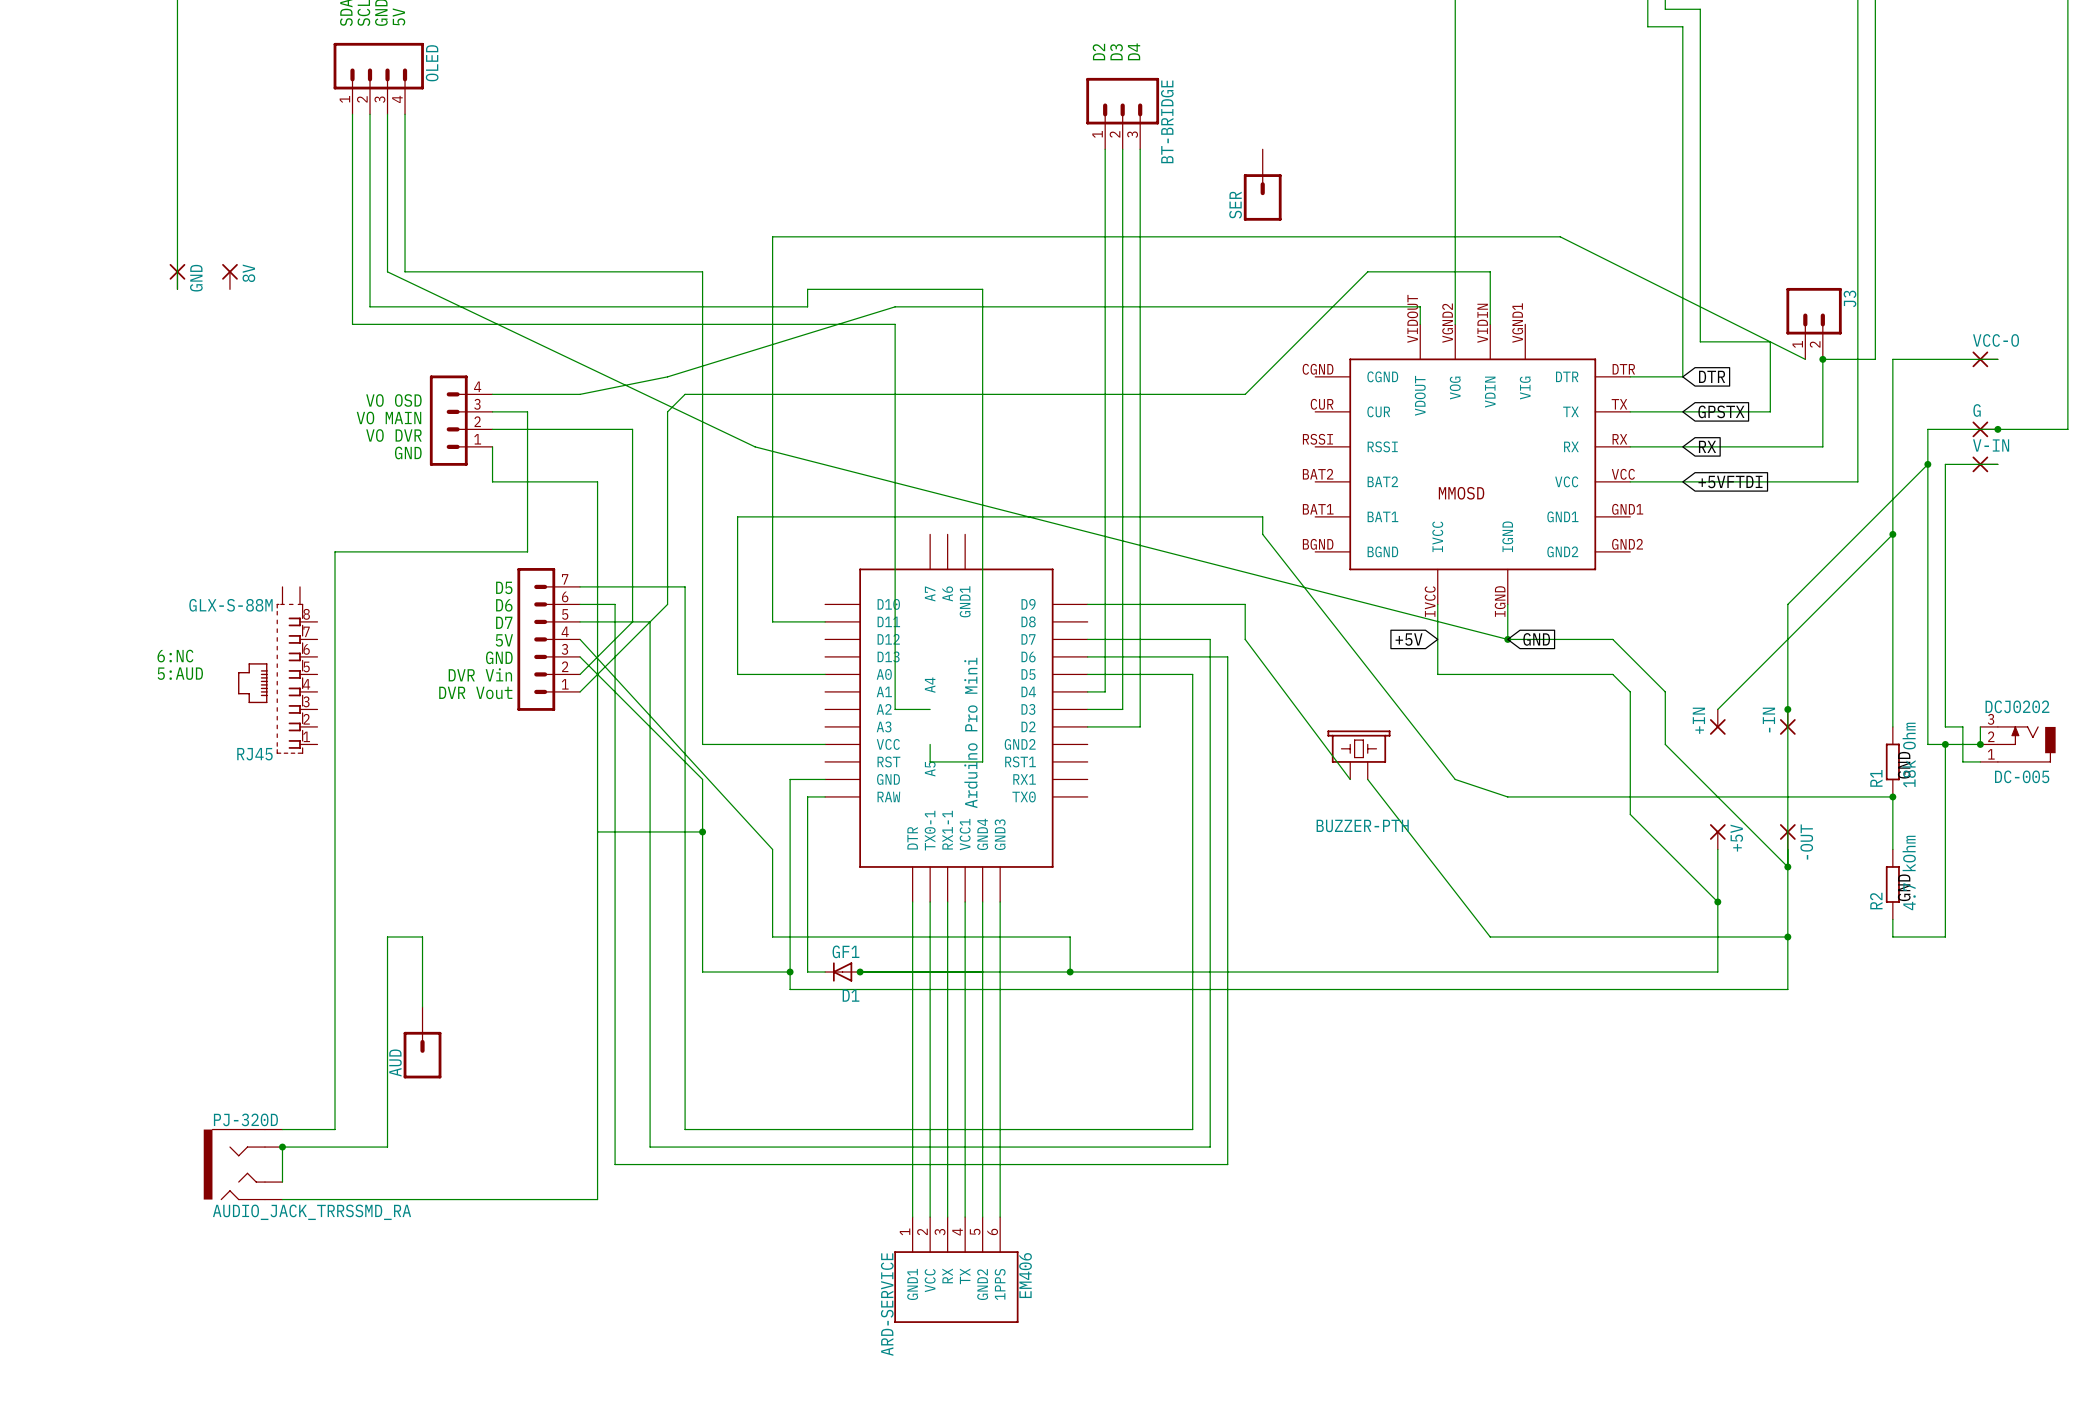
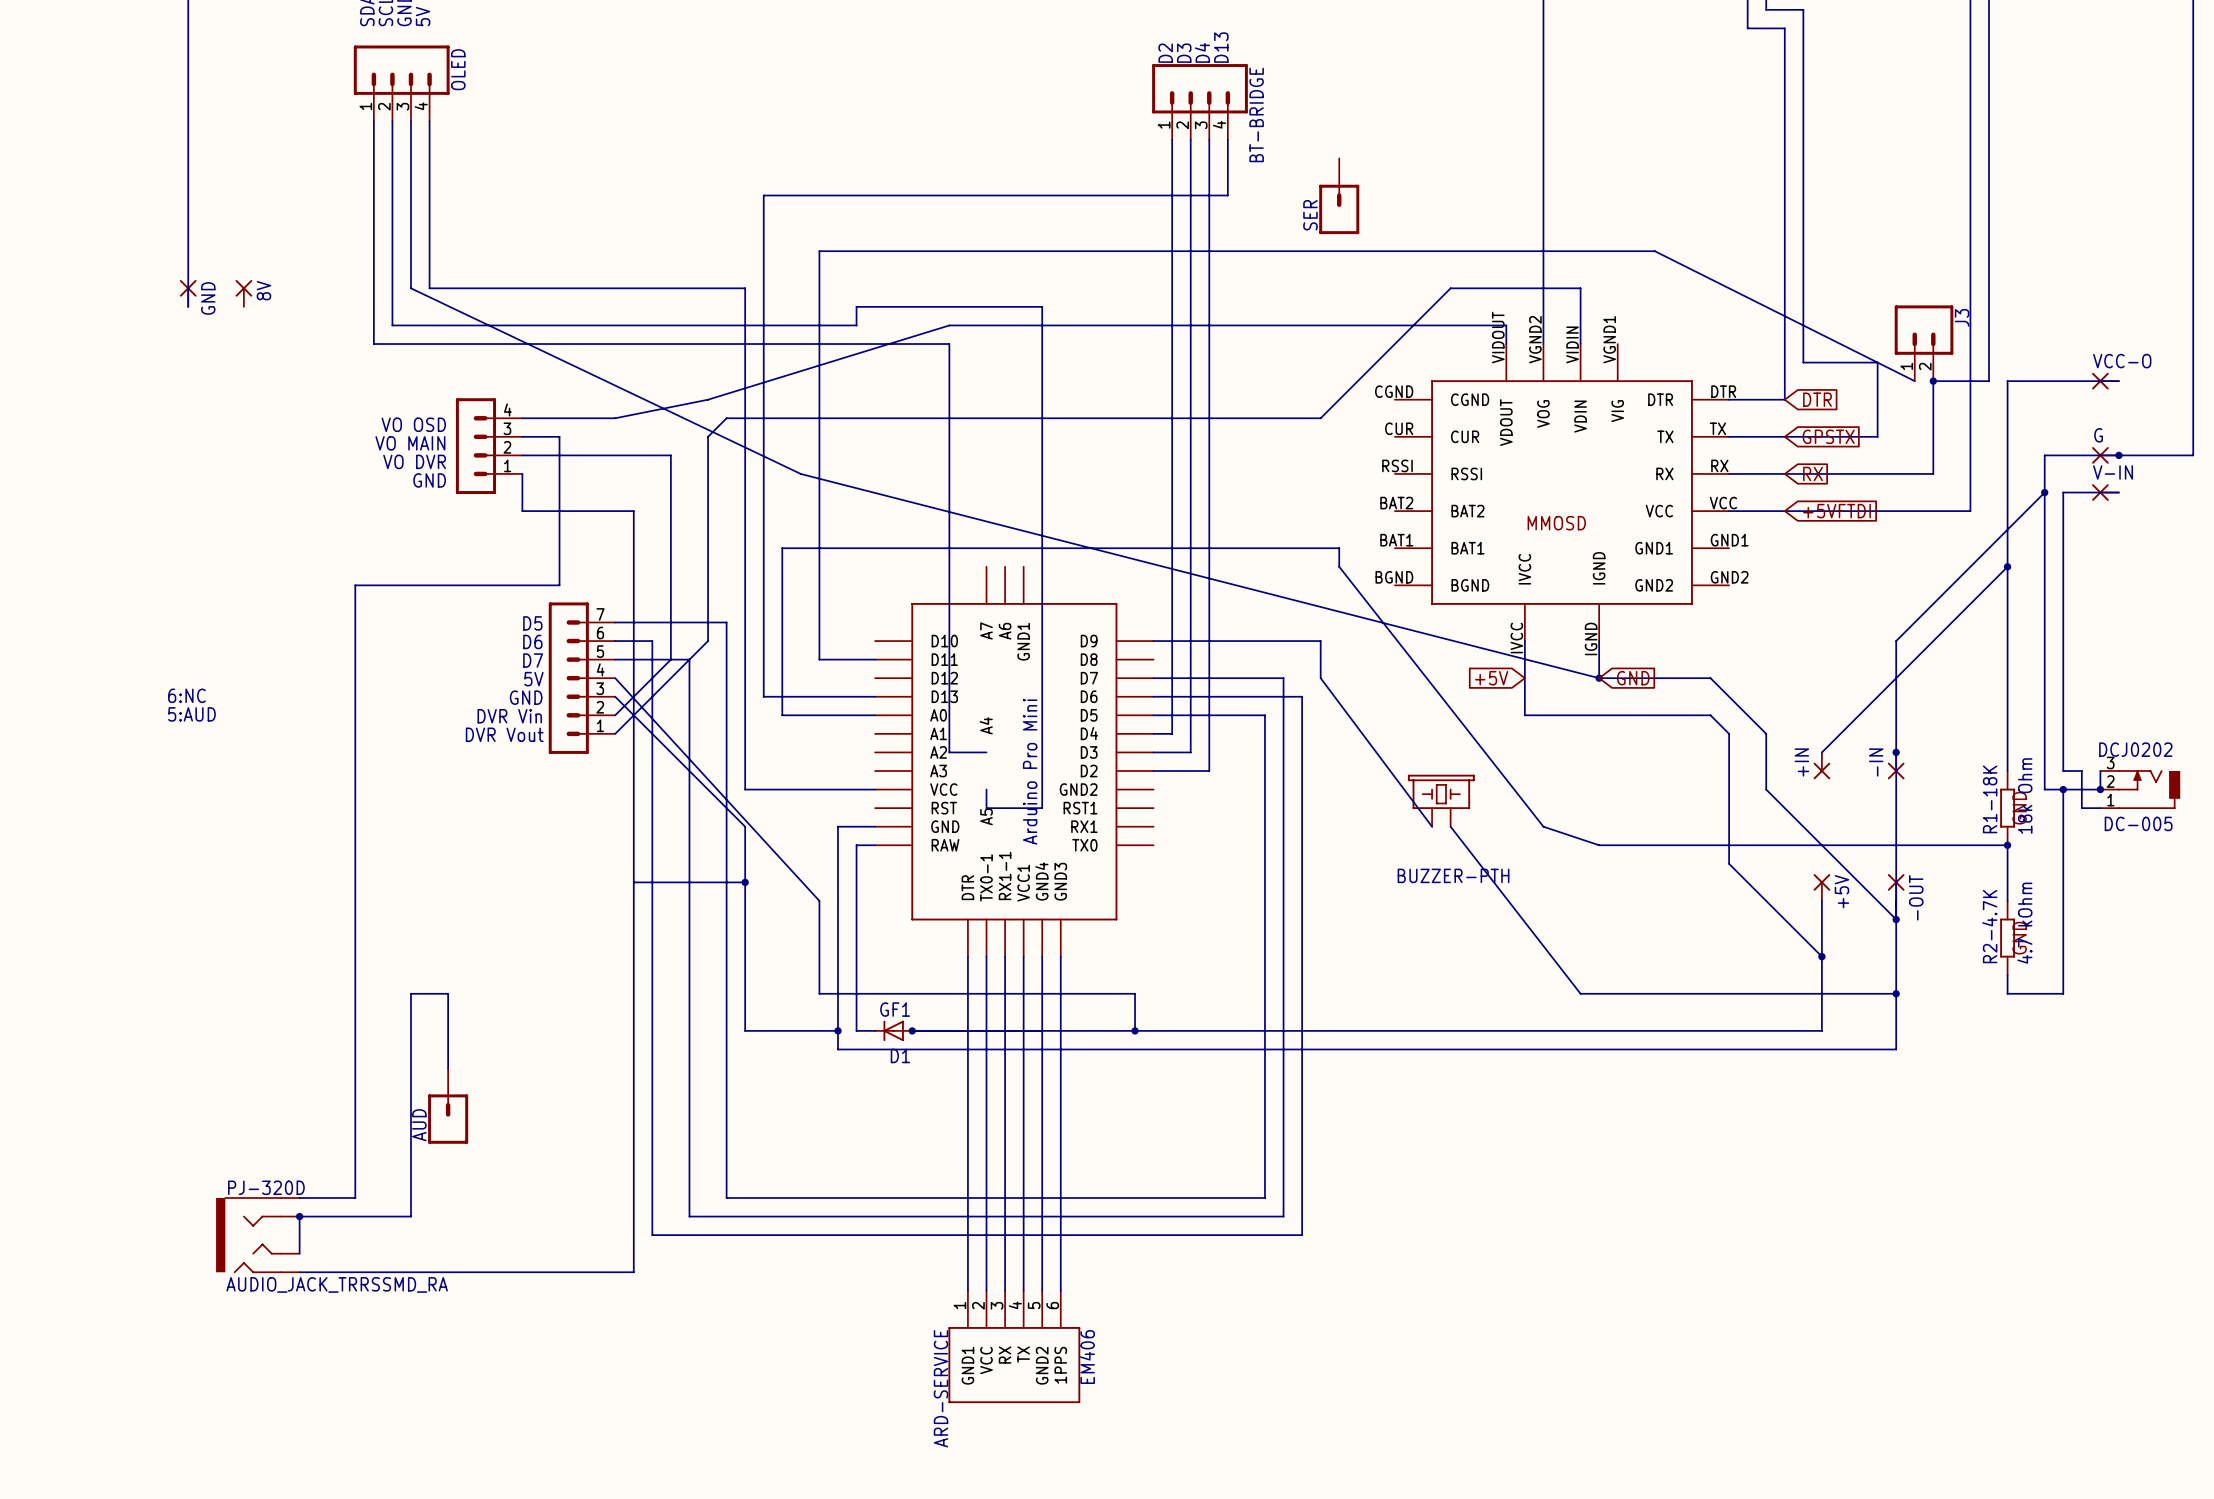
text: none -> D13 (1221, 47)
BT-BRIDGE: none -> (1200, 101)
BT-BRIDGE: (1122, 113) -> none
wire: none -> (1227, 139) (1227, 195) (763, 195) (763, 696) (875, 696)
RJ45: GLX-S-88M (277, 670) -> none
R1 name: R1 (1876, 778) -> R1-18K (1990, 799)
R2 name: R2 (1876, 901) -> R2-4.7K (1989, 926)

